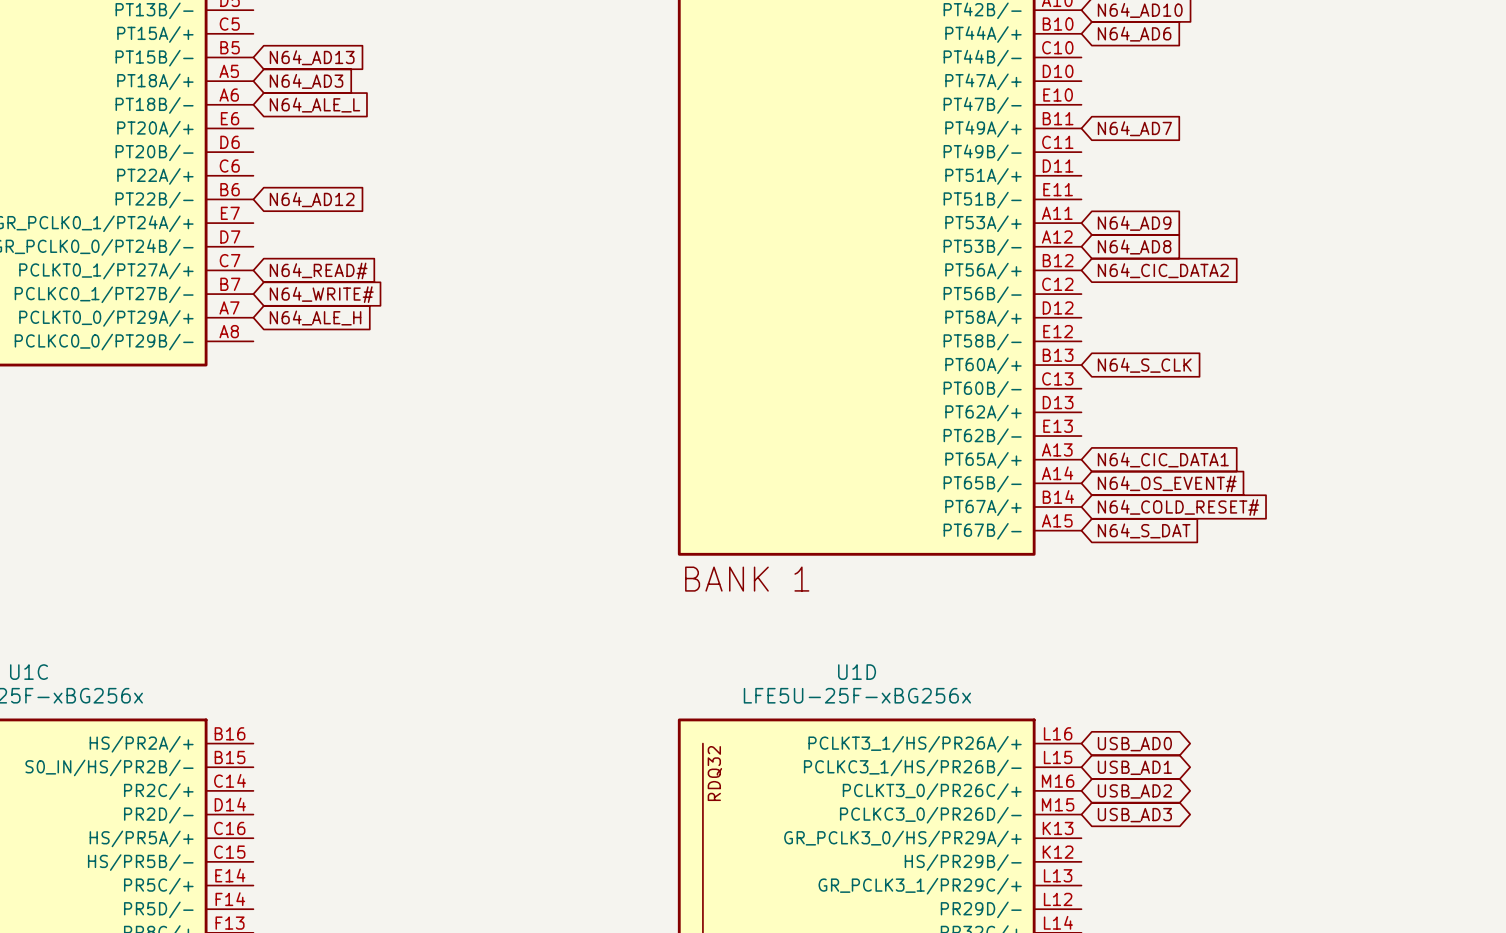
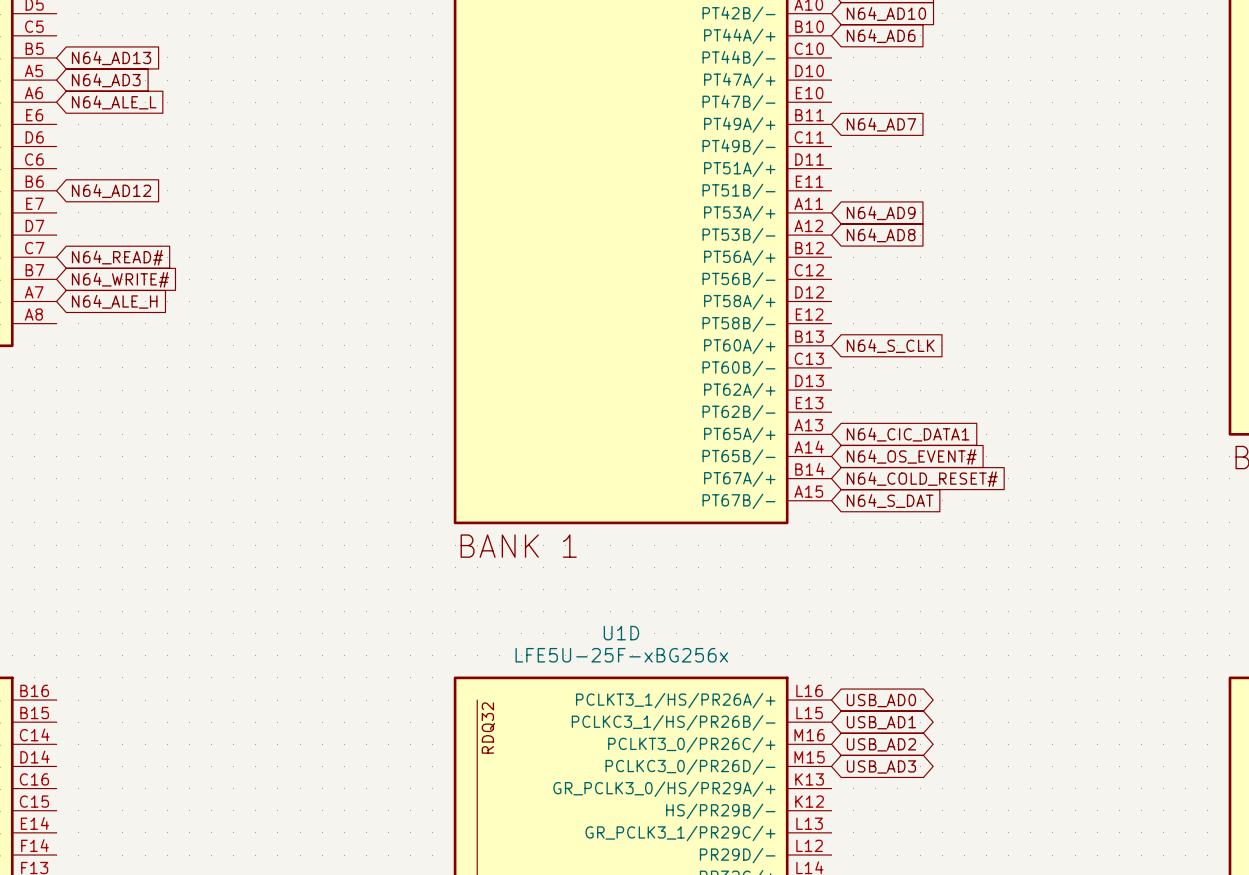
global label: N64_CIC_DATA2 (1163, 270) -> none

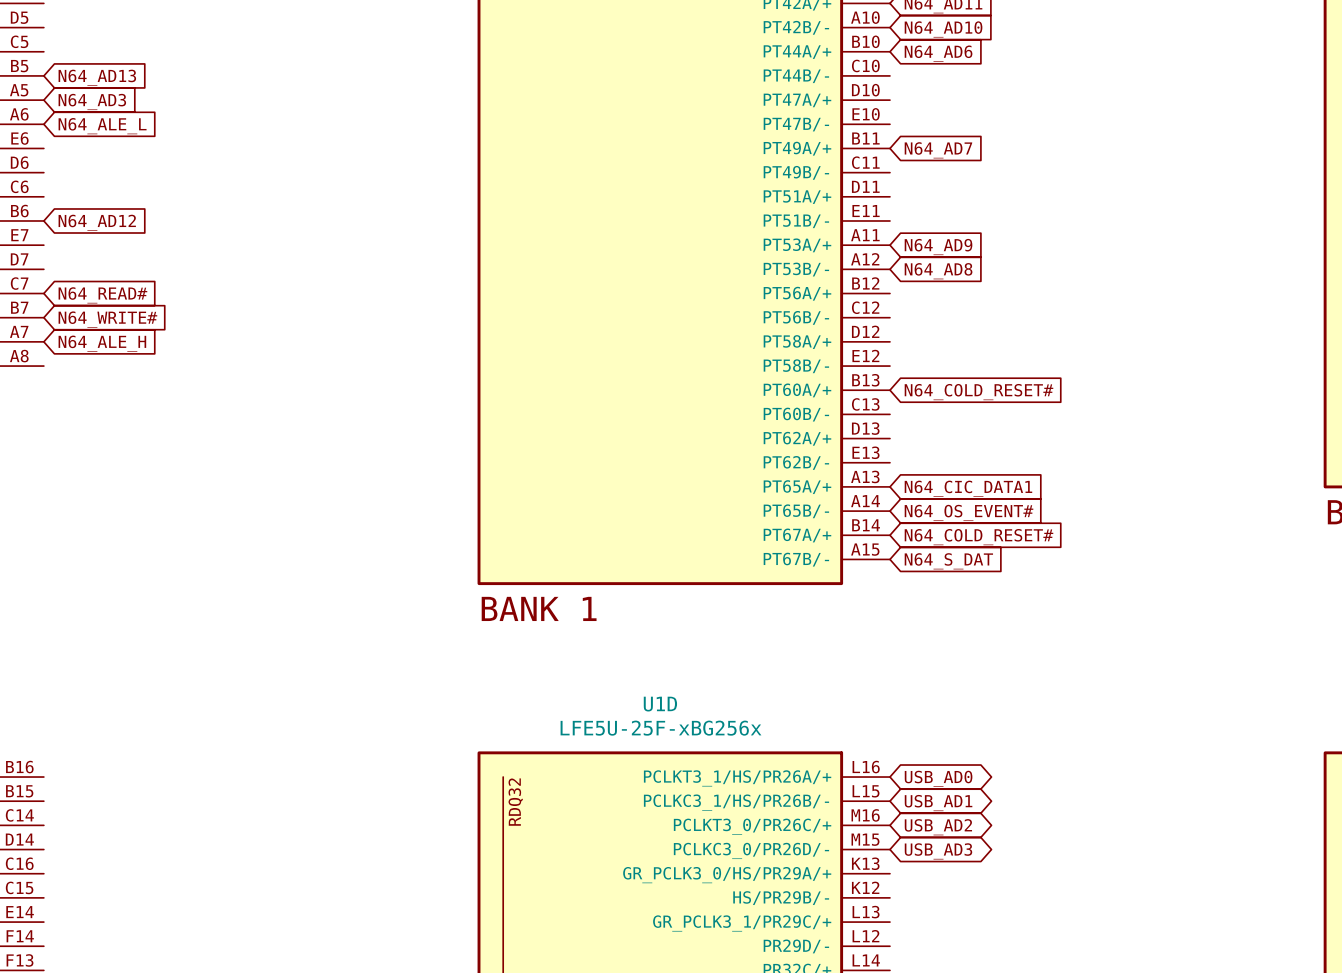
global label: N64_S_CLK (890, 346) -> N64_COLD_RESET# (978, 392)

